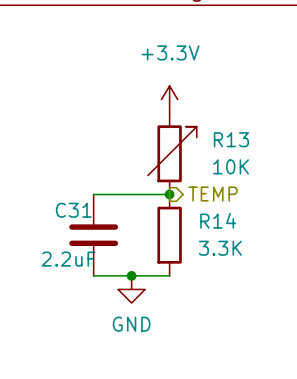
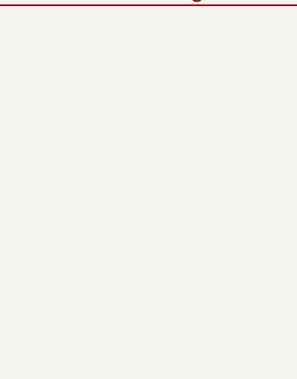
power symbol: +3.3V (169, 99) -> none
R13: 10K (172, 153) -> none
hierarchical label: TEMP (213, 193) -> none
wire: (93, 194) (169, 194) -> none
junction: (169, 194) -> none
C31: 2.2uF (93, 235) -> none
R14: 3.3K (169, 235) -> none
wire: (93, 275) (169, 275) -> none
junction: (131, 275) -> none
power symbol: GND (131, 289) -> none

